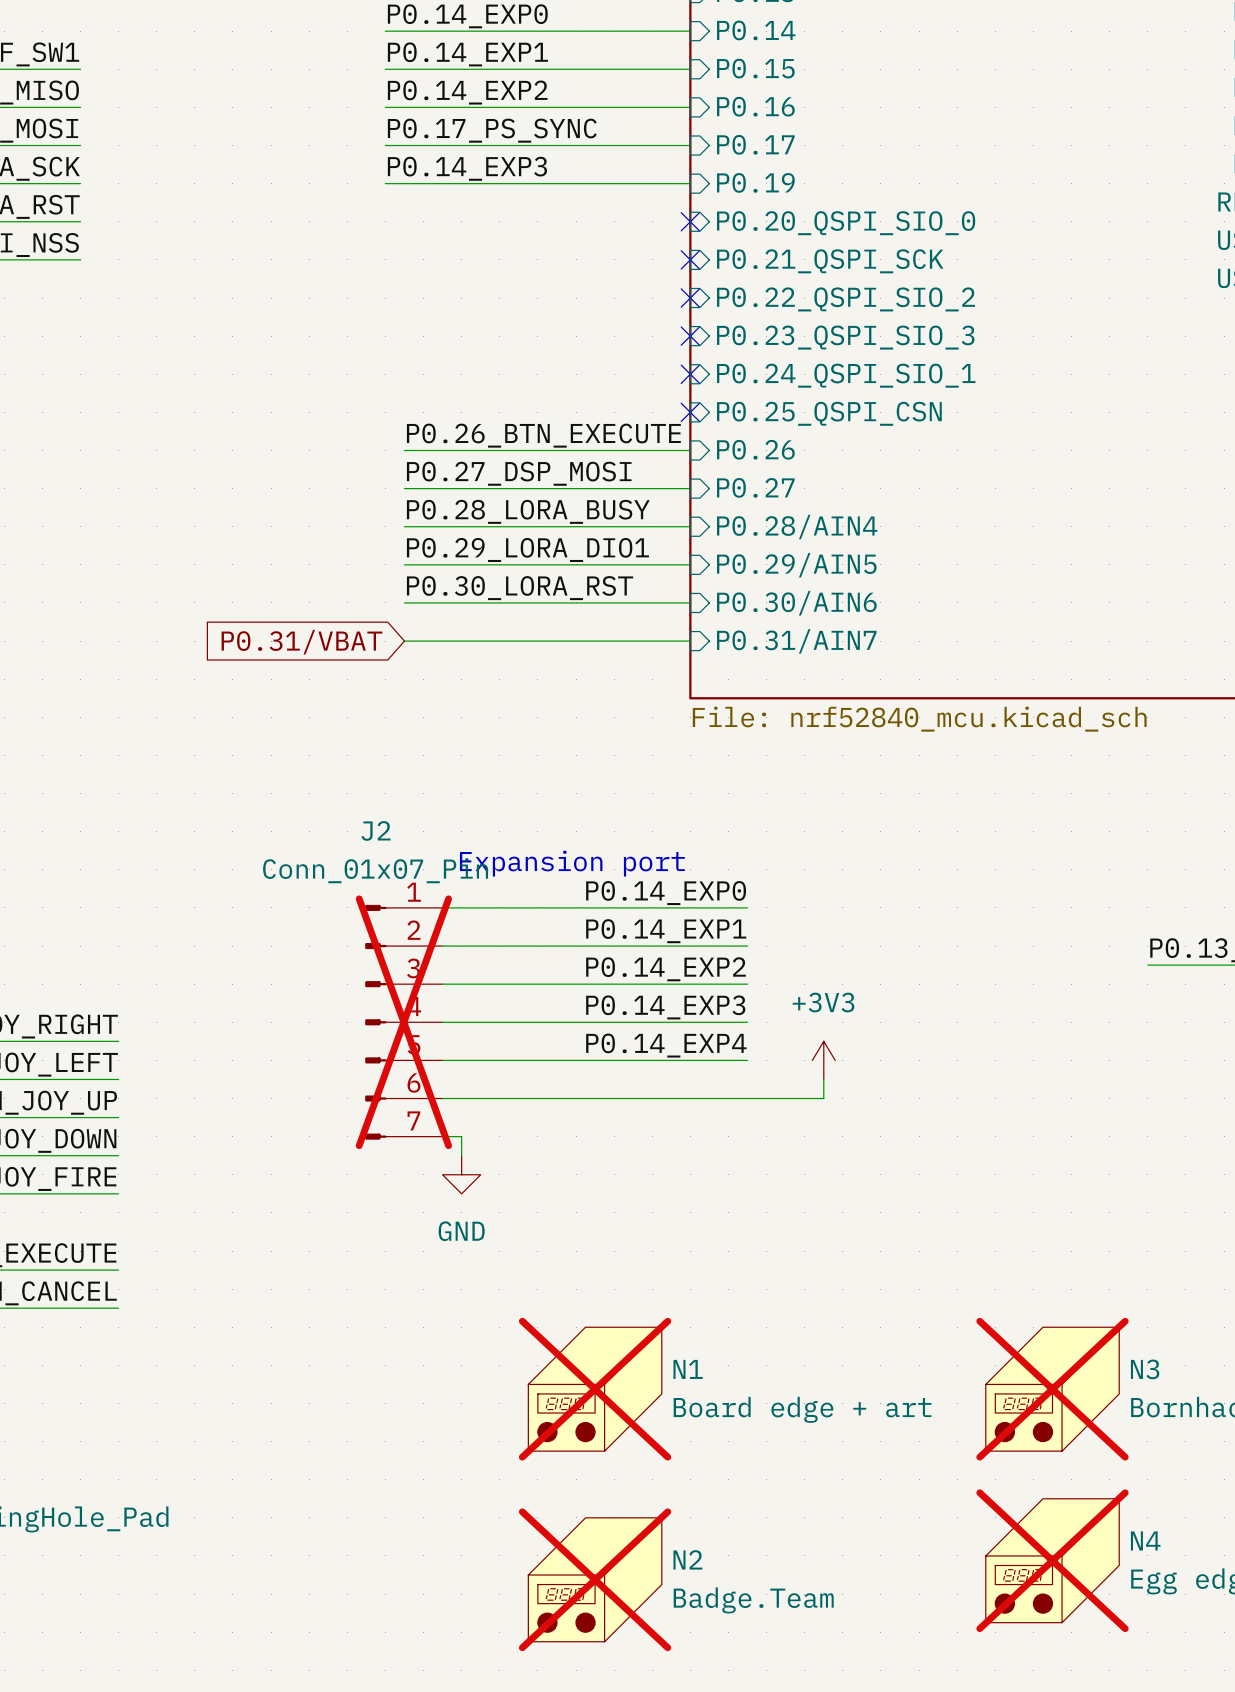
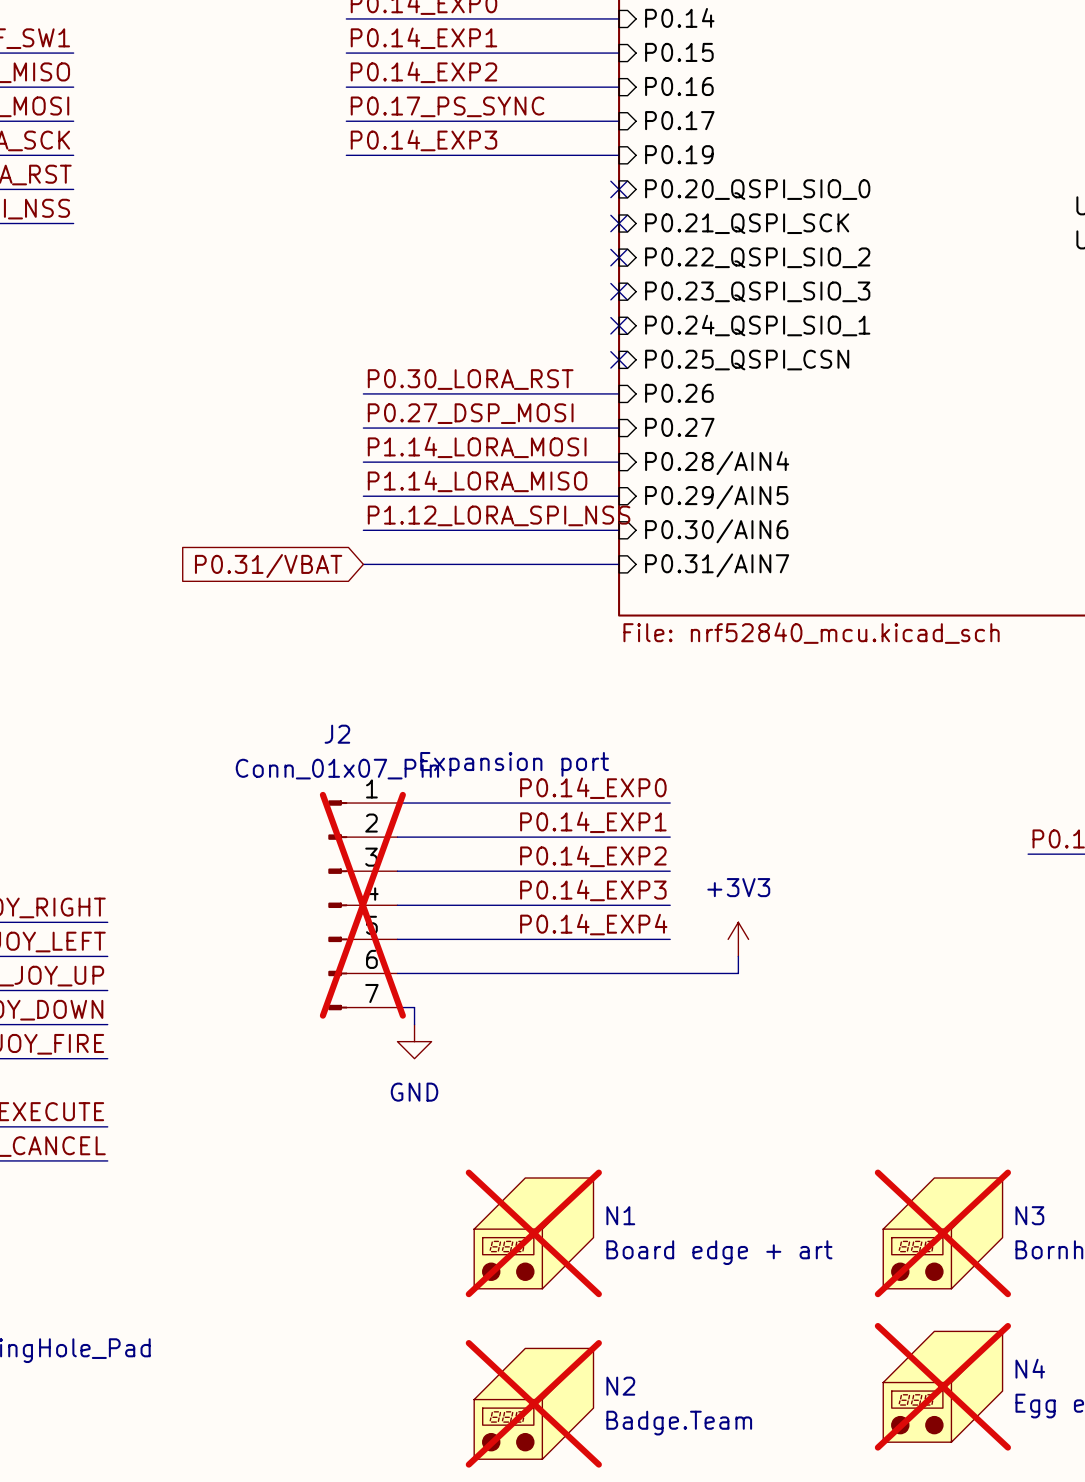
label: P0.26_BTN_EXECUTE (543, 435) -> P0.30_LORA_RST (470, 379)
label: P0.28_LORA_BUSY (528, 511) -> P1.14_LORA_MOSI (477, 447)
label: P0.29_LORA_DIO1 (527, 549) -> P1.14_LORA_MISO (477, 481)
label: P0.30_LORA_RST (520, 588) -> P1.12_LORA_SPI_NSS (499, 515)

